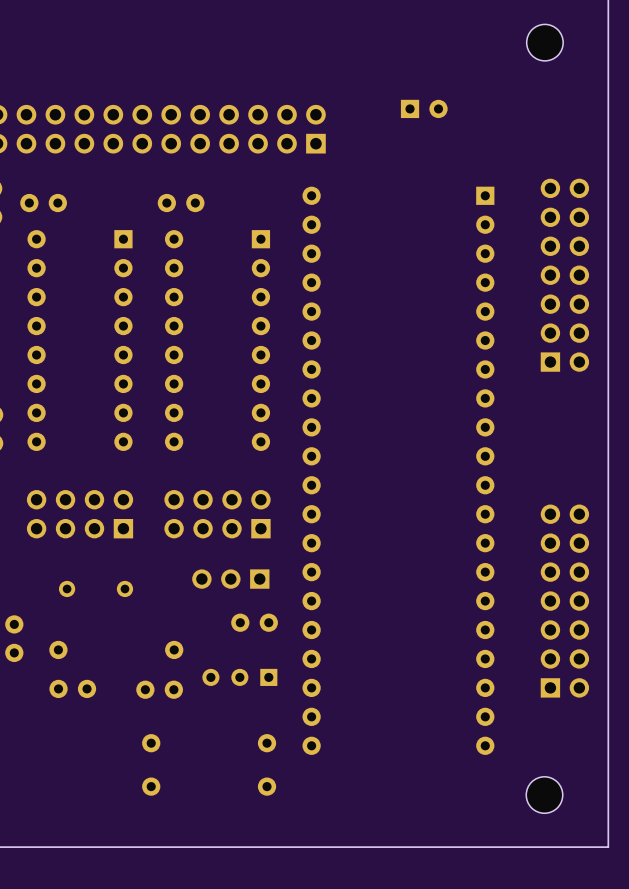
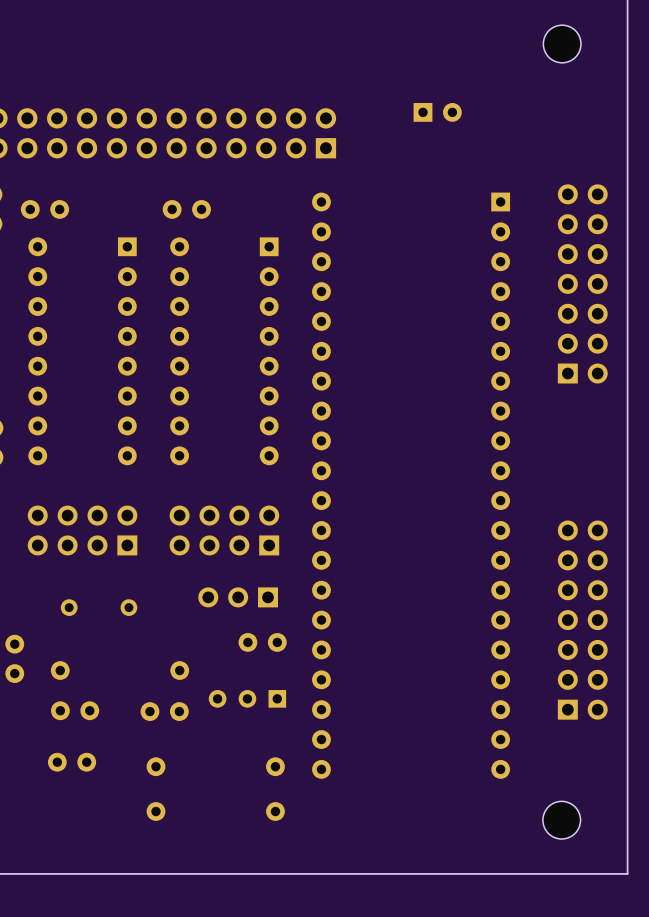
part: none -> (72, 762)

